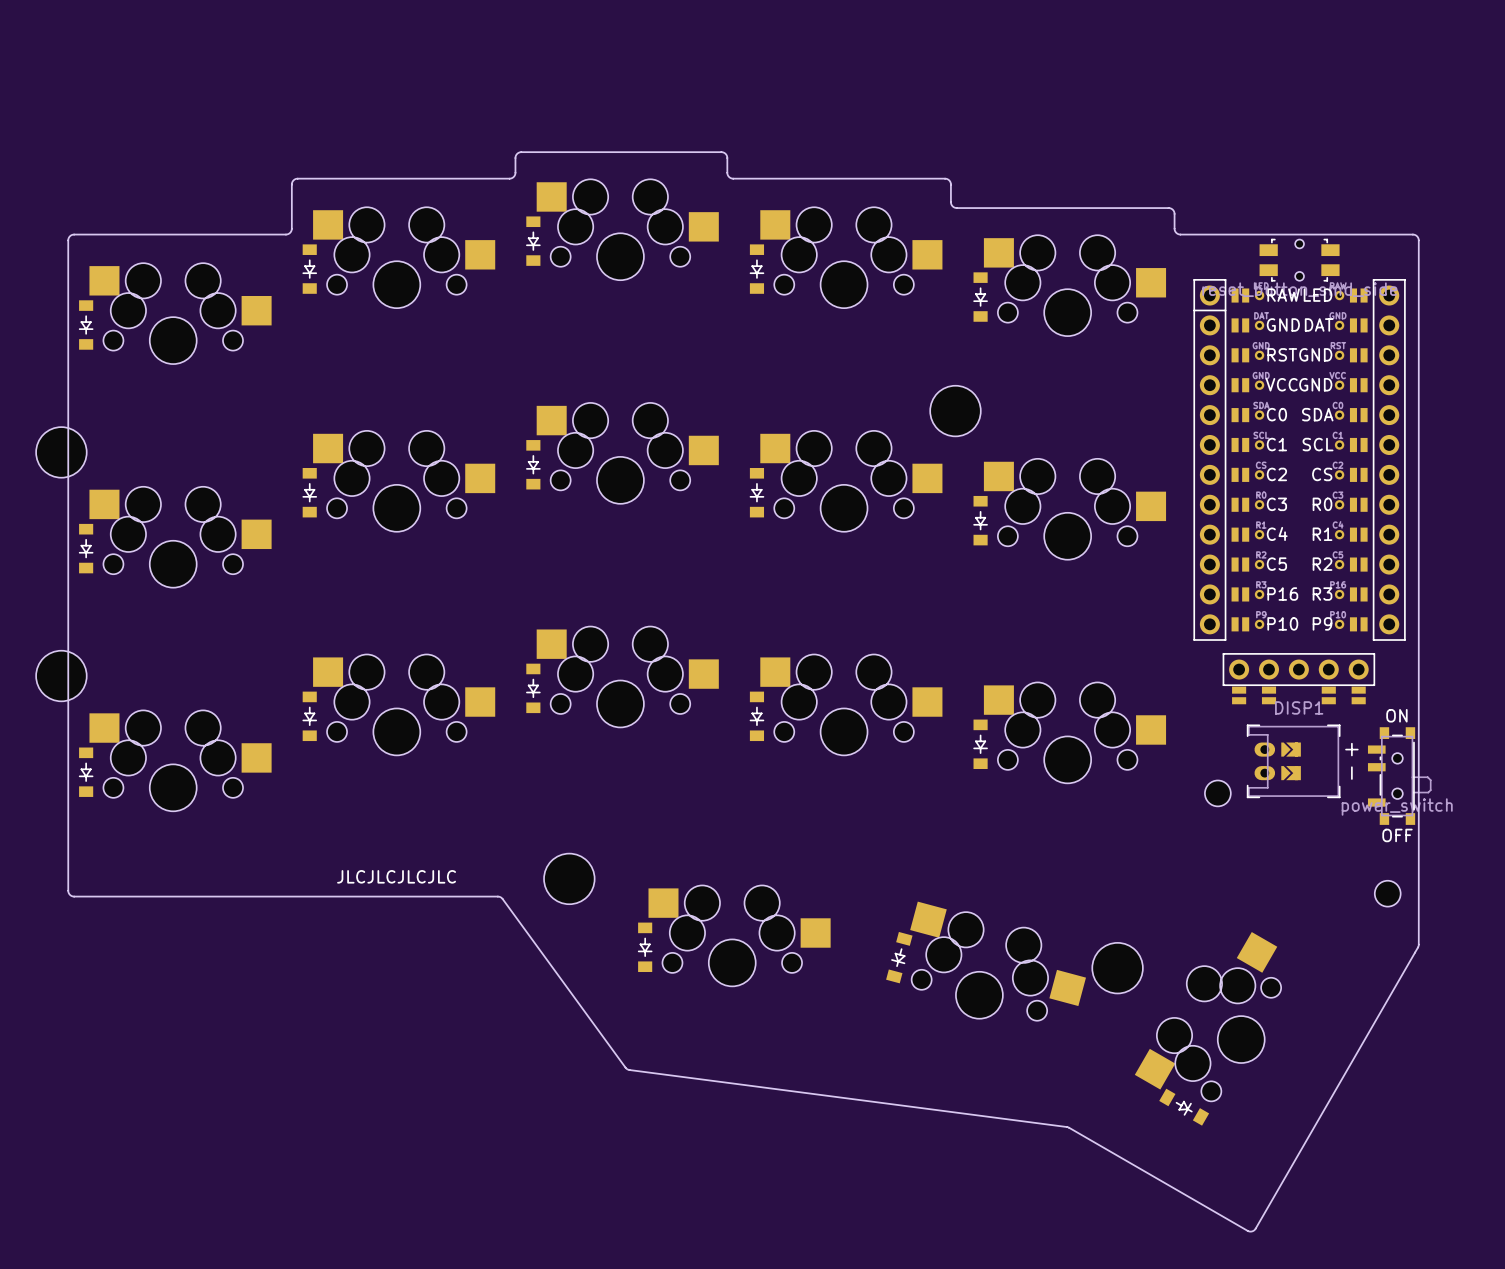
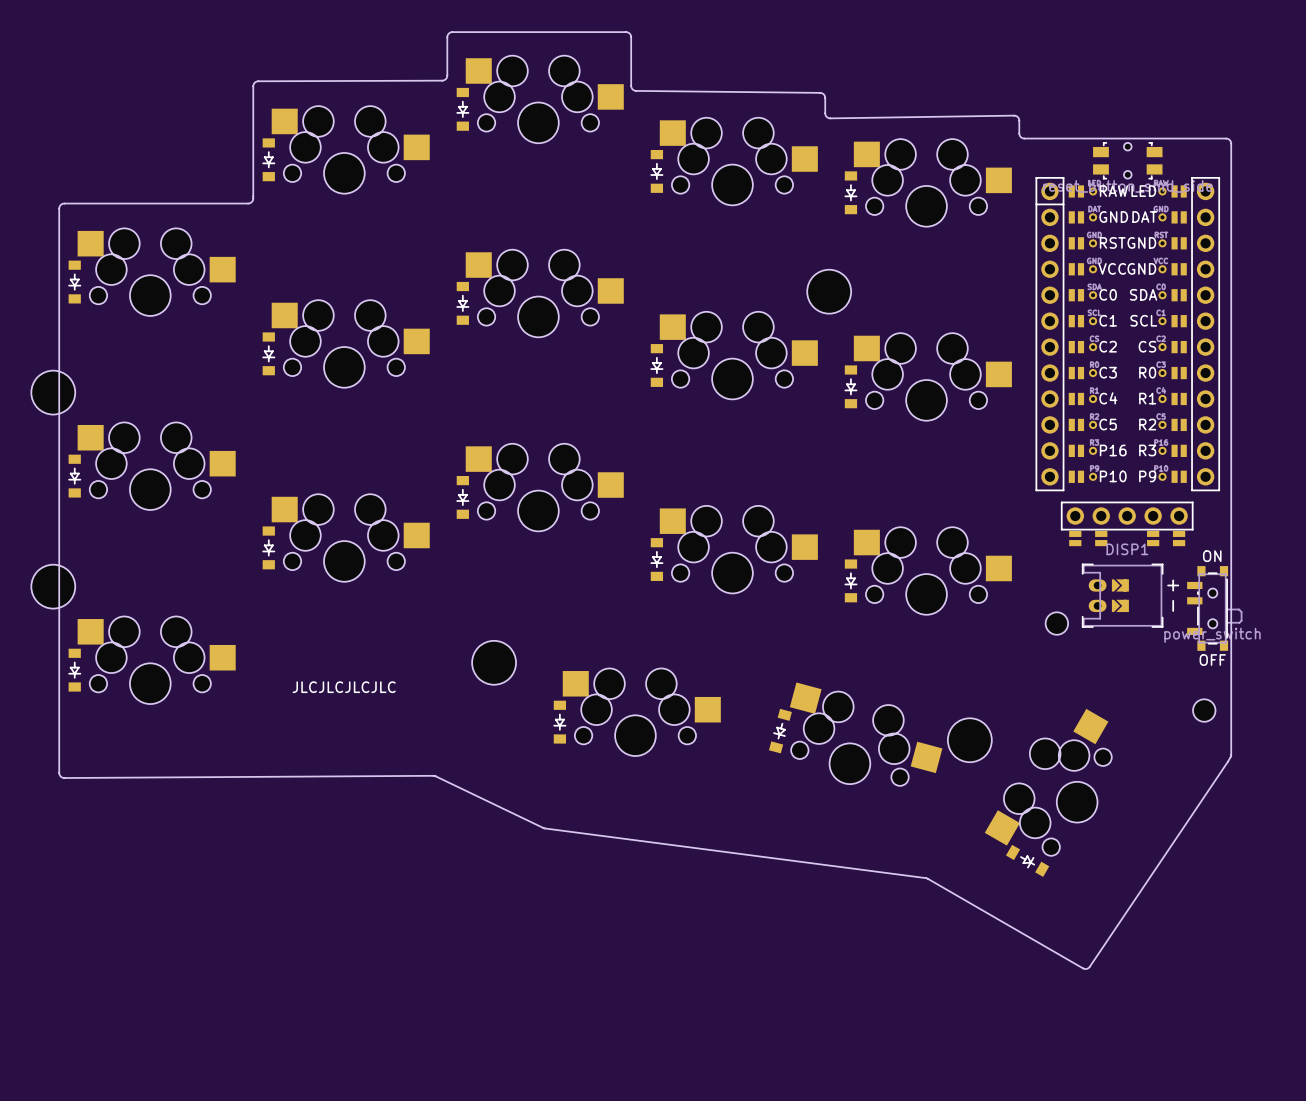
part: none -> (544, 99)
part: none -> (462, 109)
board edge: none -> (1024, 138) (1227, 138) (1231, 143) (1231, 208)
part: none -> (350, 149)
board edge: (291, 184) (293, 180) (297, 178) (510, 178) (515, 174) (515, 156) (520, 152) (721, 152) (726, 155) (727, 174) (732, 178) (946, 178) (950, 183) (951, 204) (956, 208) (1169, 208) (1174, 211) (1174, 230) (1179, 234) (1412, 234) (1417, 236) (1418, 240) -> (253, 160) (253, 86) (255, 81) (443, 80) (447, 76) (447, 36) (452, 32) (627, 32) (631, 36) (631, 86) (634, 90) (820, 92) (825, 96) (825, 114) (829, 118) (1014, 115) (1019, 119) (1019, 135) (1024, 138)
part: none -> (268, 159)
part: none -> (932, 182)
part: none -> (850, 192)
part: (627, 229) -> none
part: (533, 241) -> none
part: (404, 257) -> none
part position: (851, 257) -> (738, 161)
part position: (1299, 260) -> (1127, 160)
part: (309, 269) -> none
part position: (756, 269) -> (656, 171)
part: (1074, 285) -> none
part: (980, 297) -> none
part: none -> (544, 293)
part: none -> (462, 303)
part: none -> (350, 343)
part: none -> (268, 353)
part position: (955, 411) -> (829, 291)
part: none -> (932, 376)
part: none -> (850, 386)
part: (627, 453) -> none
part position: (1299, 459) -> (1127, 334)
part: (533, 464) -> none
part: (404, 481) -> none
part position: (851, 481) -> (738, 355)
part: (309, 492) -> none
part position: (756, 492) -> (656, 365)
part: (1074, 509) -> none
part: (980, 520) -> none
part: none -> (544, 487)
part: none -> (462, 497)
part: none -> (350, 538)
part: none -> (268, 547)
part: none -> (932, 570)
part: none -> (850, 580)
part: (627, 676) -> none
DISP1 position: (1298, 678) -> (1127, 523)
part: (533, 688) -> none
part: (404, 704) -> none
part position: (851, 704) -> (738, 549)
part: (309, 716) -> none
part position: (756, 716) -> (656, 559)
part: (1074, 732) -> none
part: (980, 744) -> none
part position: (1302, 761) -> (1130, 595)
part position: (1399, 776) -> (1214, 608)
part position: (1217, 793) -> (1056, 623)
part: none -> (641, 712)
part: none -> (559, 722)
board edge: (1418, 869) (1418, 946) (1255, 1228) (1250, 1231) (1067, 1127) (627, 1069) (499, 896) (74, 896) (69, 894) (68, 890) -> (1231, 754) (1089, 966) (1085, 969) (926, 878) (544, 828) (434, 775) (64, 778) (60, 776) (59, 772)
text position: JLCJLCJLCJLC (396, 876) -> JLCJLCJLCJLC (344, 687)
part position: (569, 878) -> (494, 662)
part position: (1387, 893) -> (1204, 710)
part: (739, 935) -> none
part: (645, 947) -> none
part position: (899, 957) -> (780, 731)
part position: (998, 961) -> (866, 734)
part position: (1117, 968) -> (969, 740)
part position: (1207, 1016) -> (1048, 782)
part position: (1184, 1107) -> (1027, 860)

